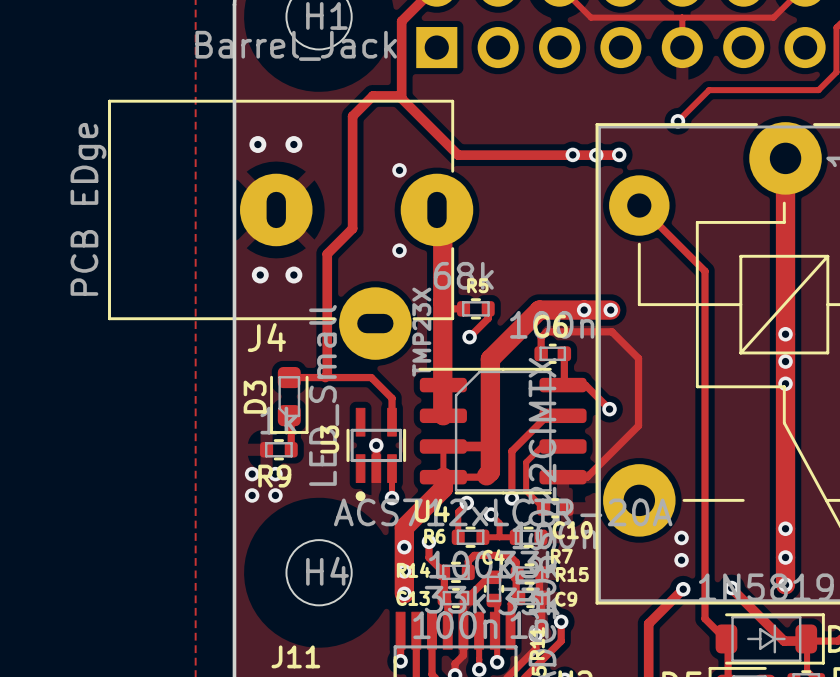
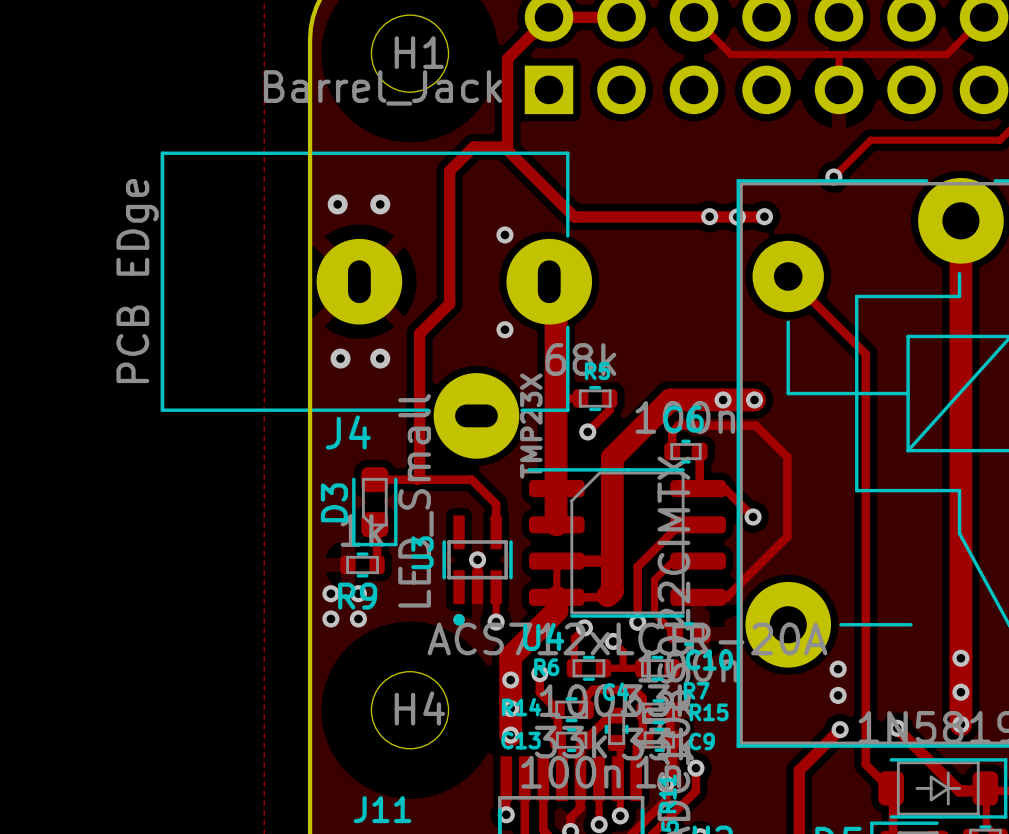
via: (785, 334) -> none
via: (785, 361) -> none
via: (785, 383) -> none

